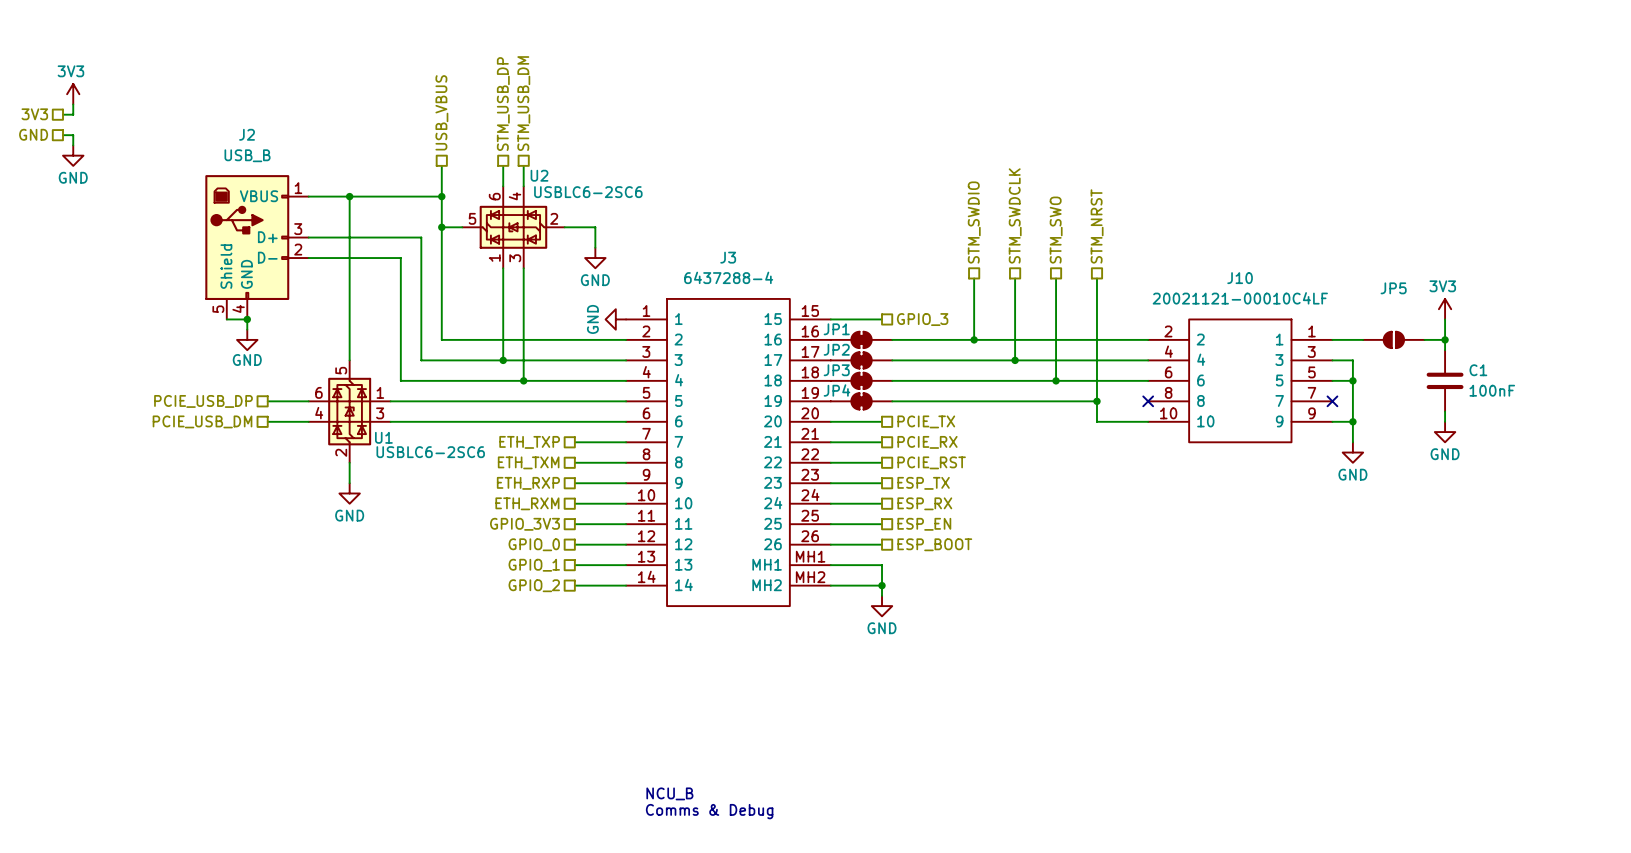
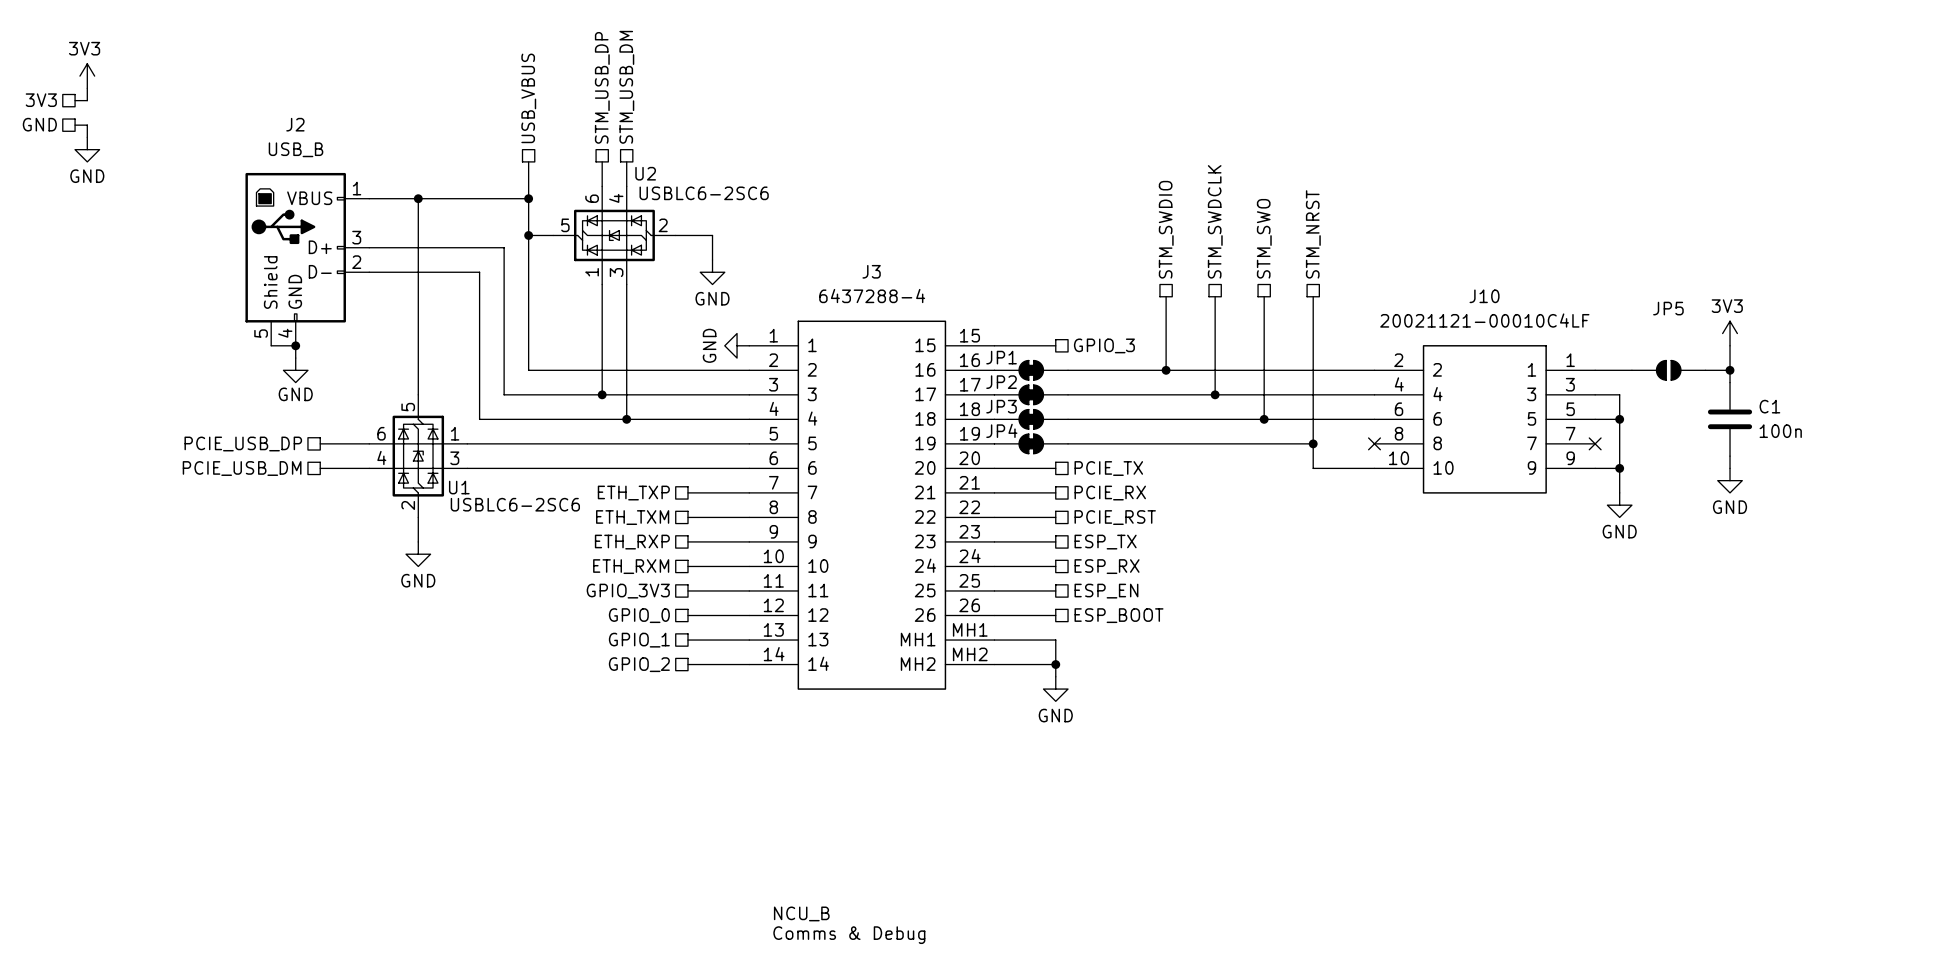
C1 value: 100nF (1492, 390) -> 100n (1780, 431)

